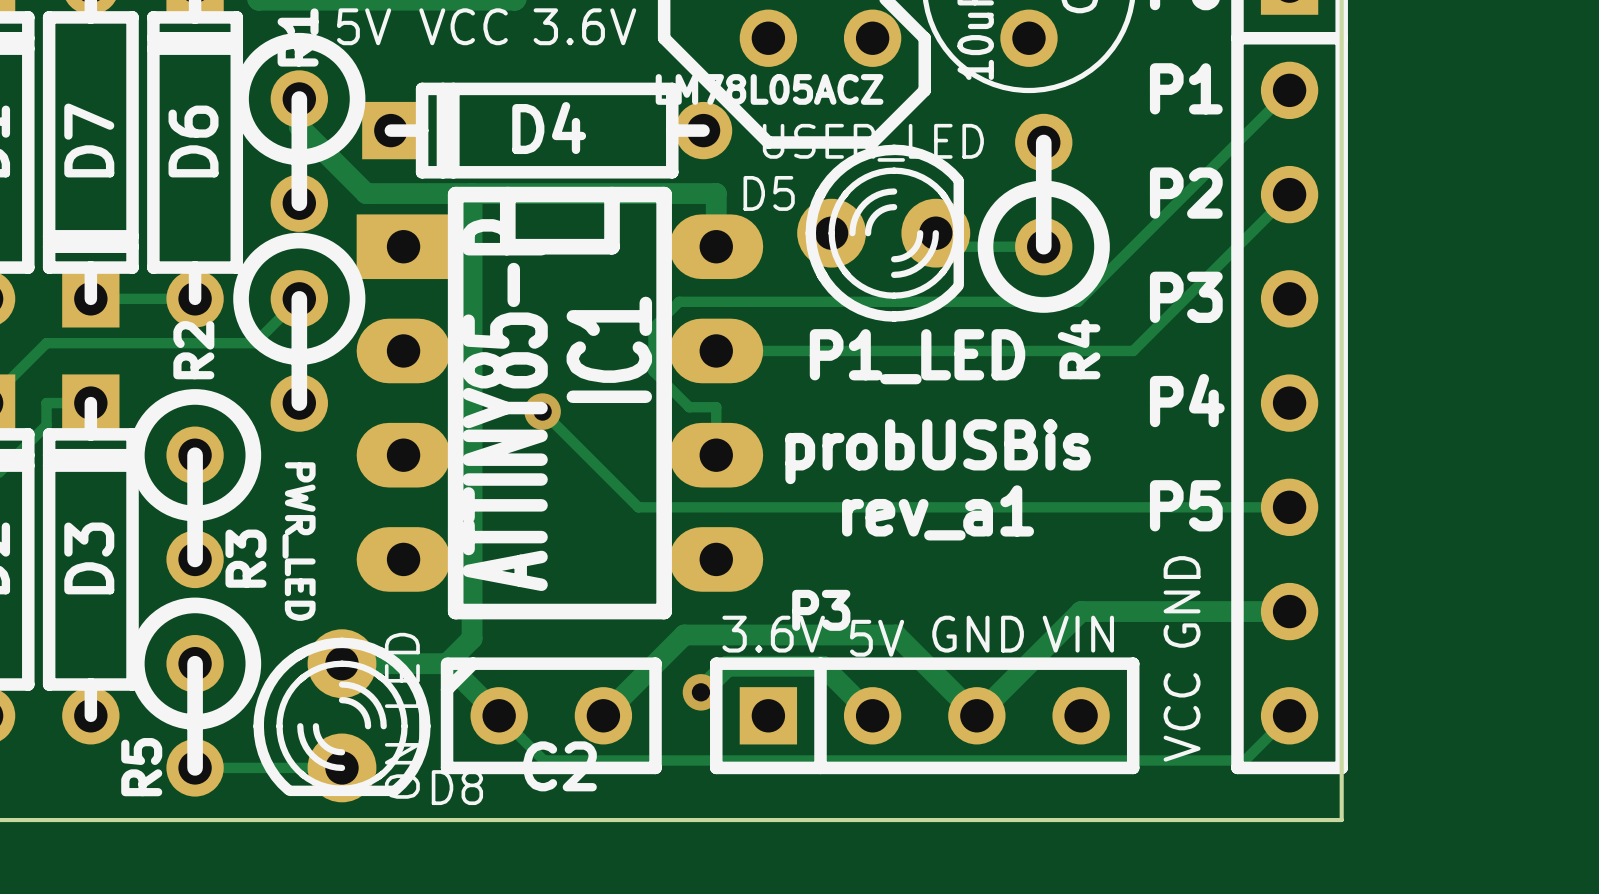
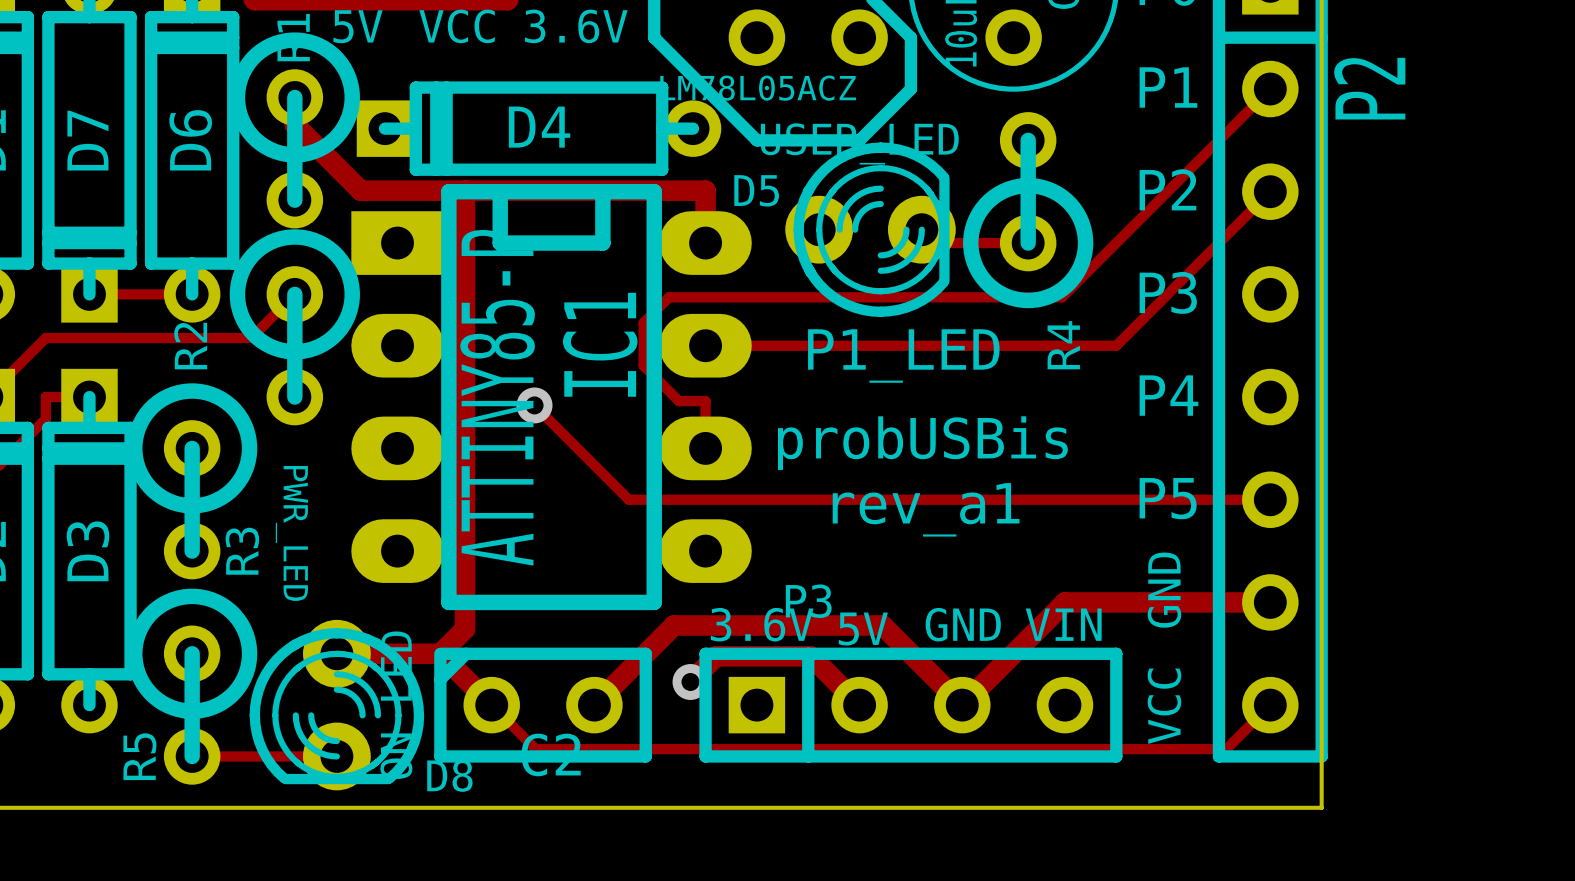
P2 name: none -> P2 (1369, 88)

